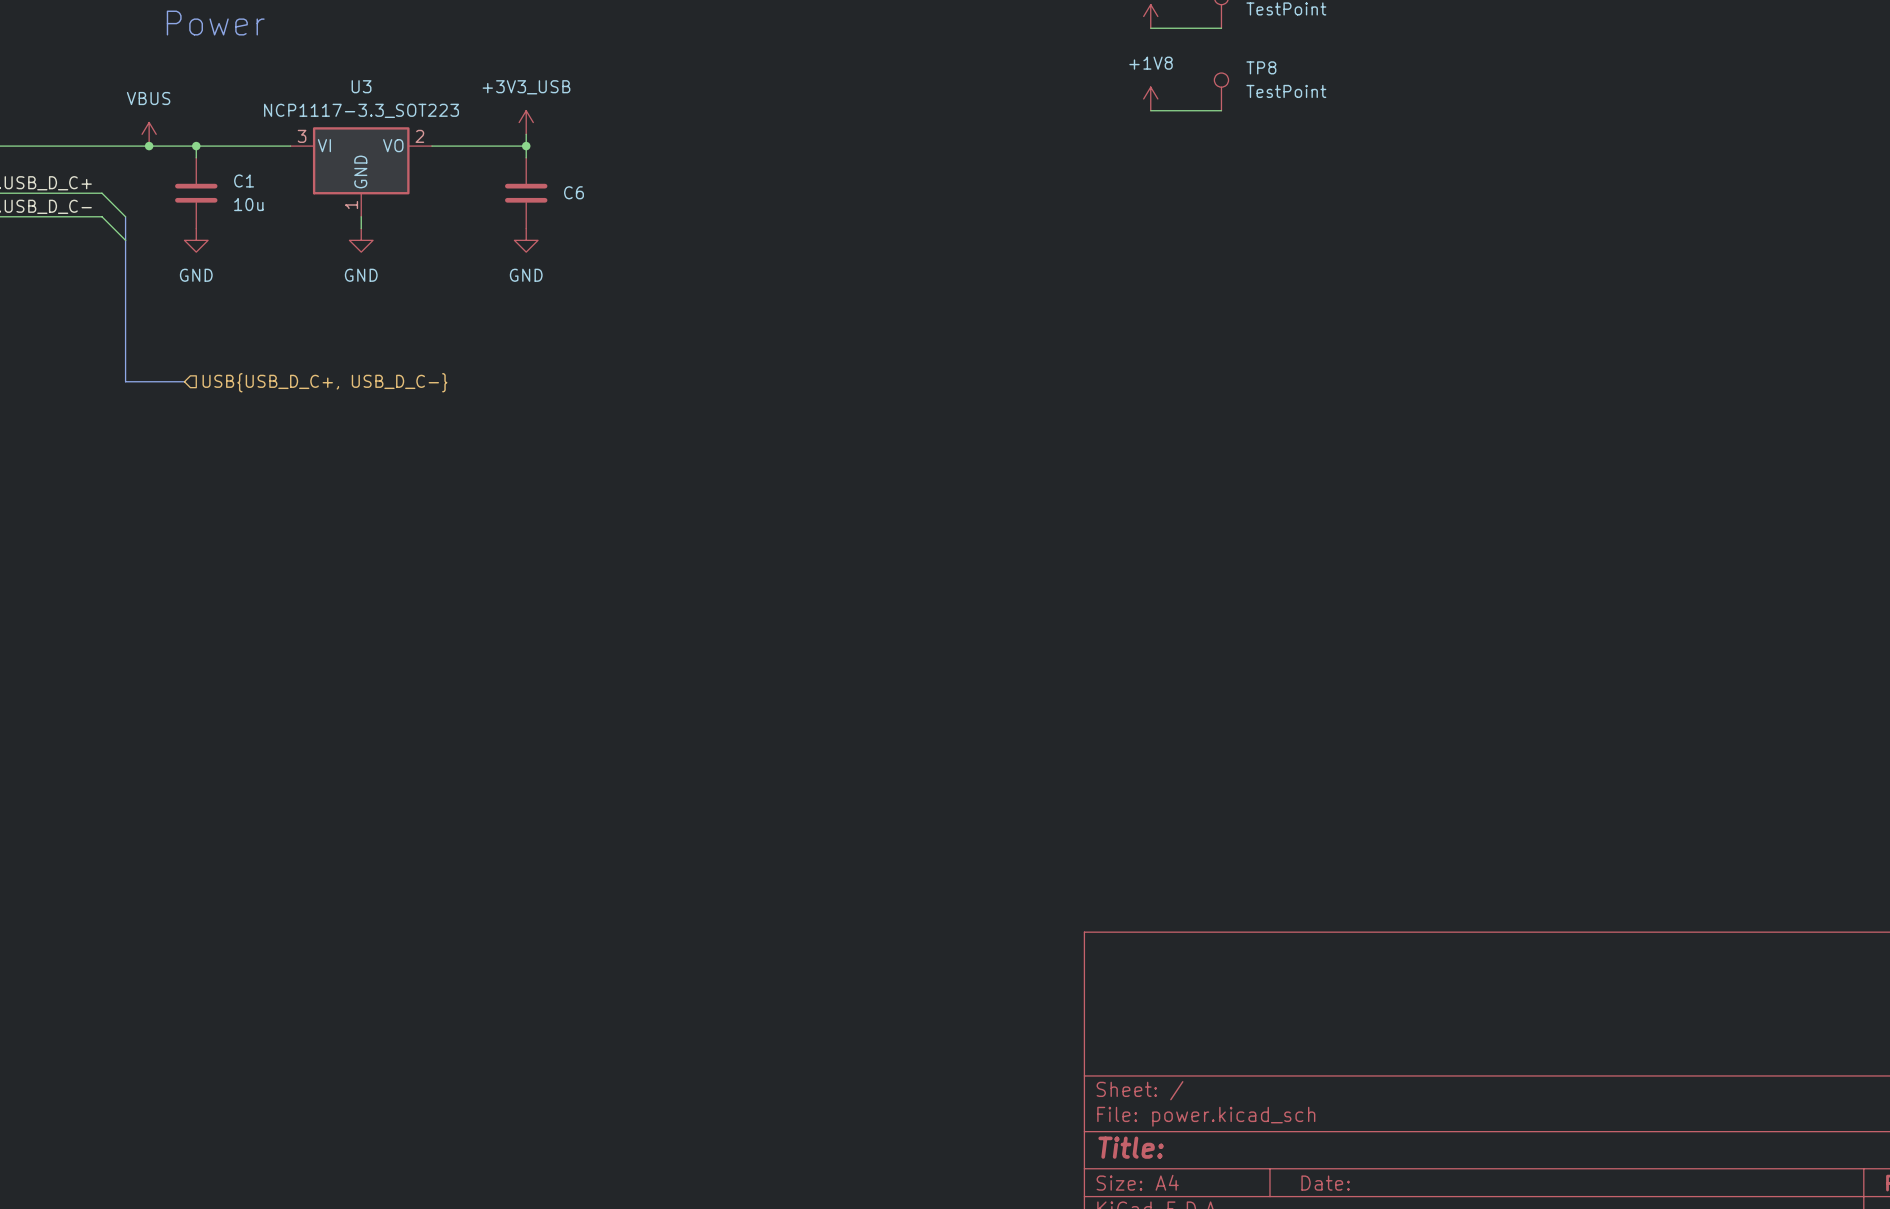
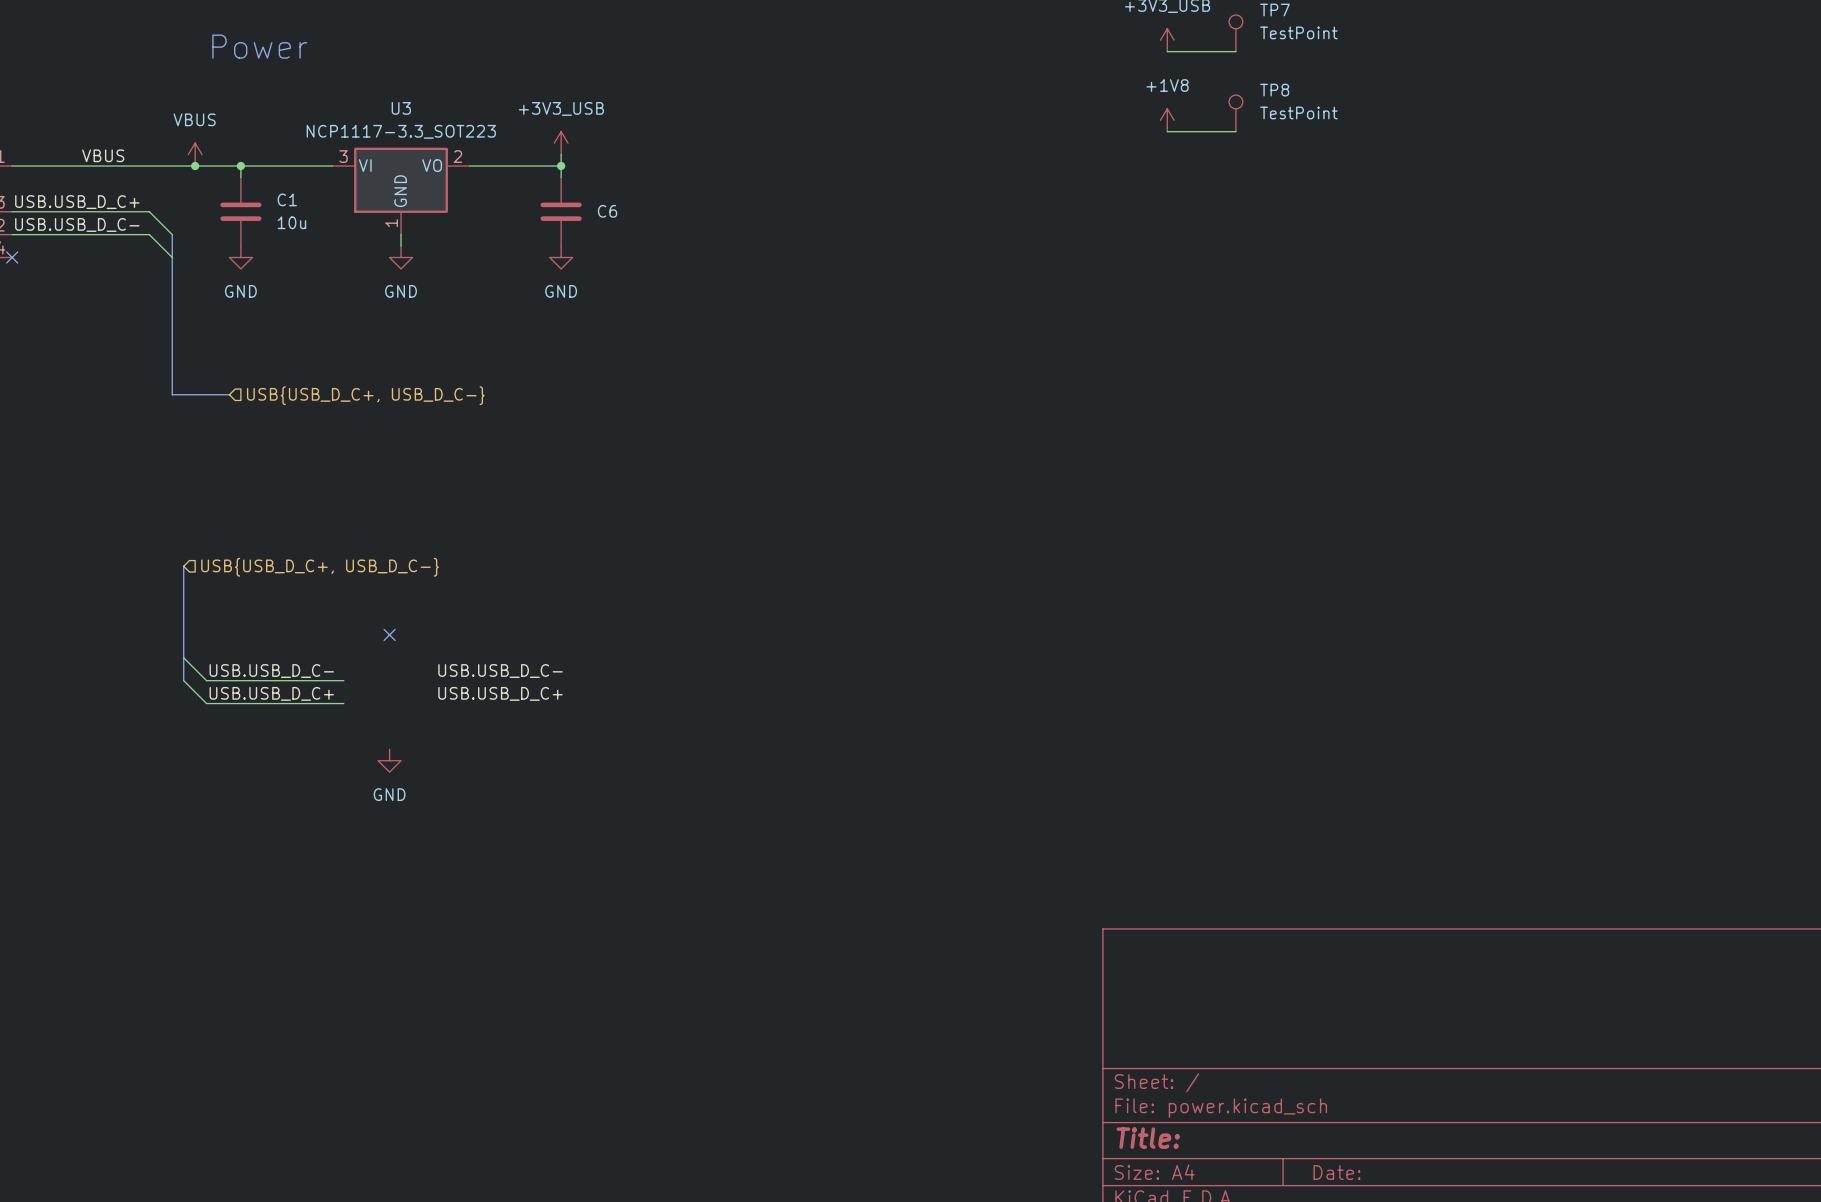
label: none -> VBUS (103, 155)
bus: none -> (183, 566) (183, 680)
hierarchical label: none -> USB{USB_D_C+, USB_D_C-} (320, 567)
no-connect mark: none -> (389, 634)
wire: none -> (183, 657) (206, 680) (343, 680)
label: none -> USB.USB_D_C- (271, 671)
label: none -> USB.USB_D_C- (500, 671)
wire: none -> (183, 680) (206, 703) (343, 703)
label: none -> USB.USB_D_C+ (271, 693)
label: none -> USB.USB_D_C+ (500, 693)
power symbol: none -> GND (389, 760)

